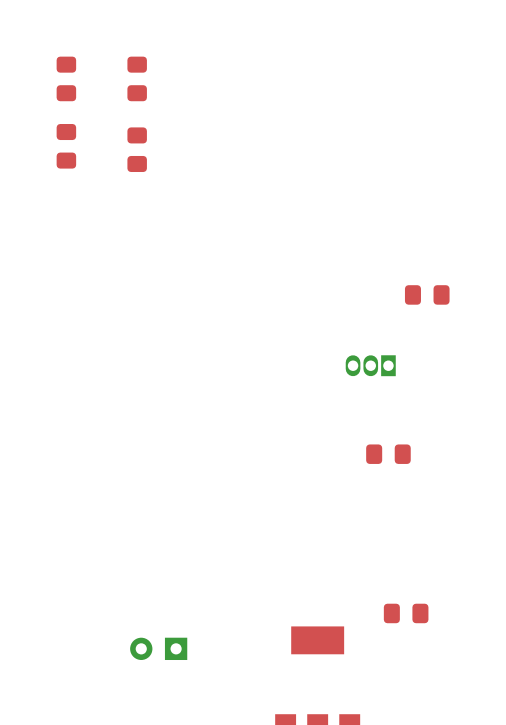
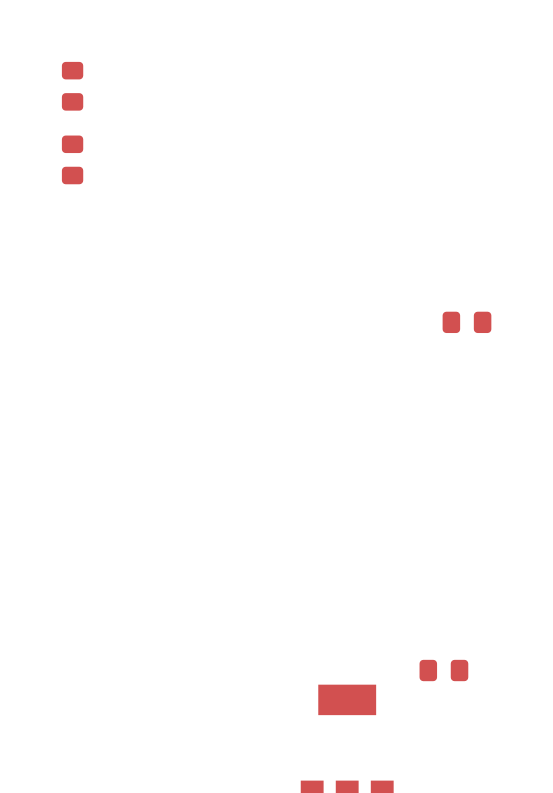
part: (137, 78) -> none
part: (137, 149) -> none
part: (370, 365) -> none
part: (388, 454) -> none
part: (158, 648) -> none

